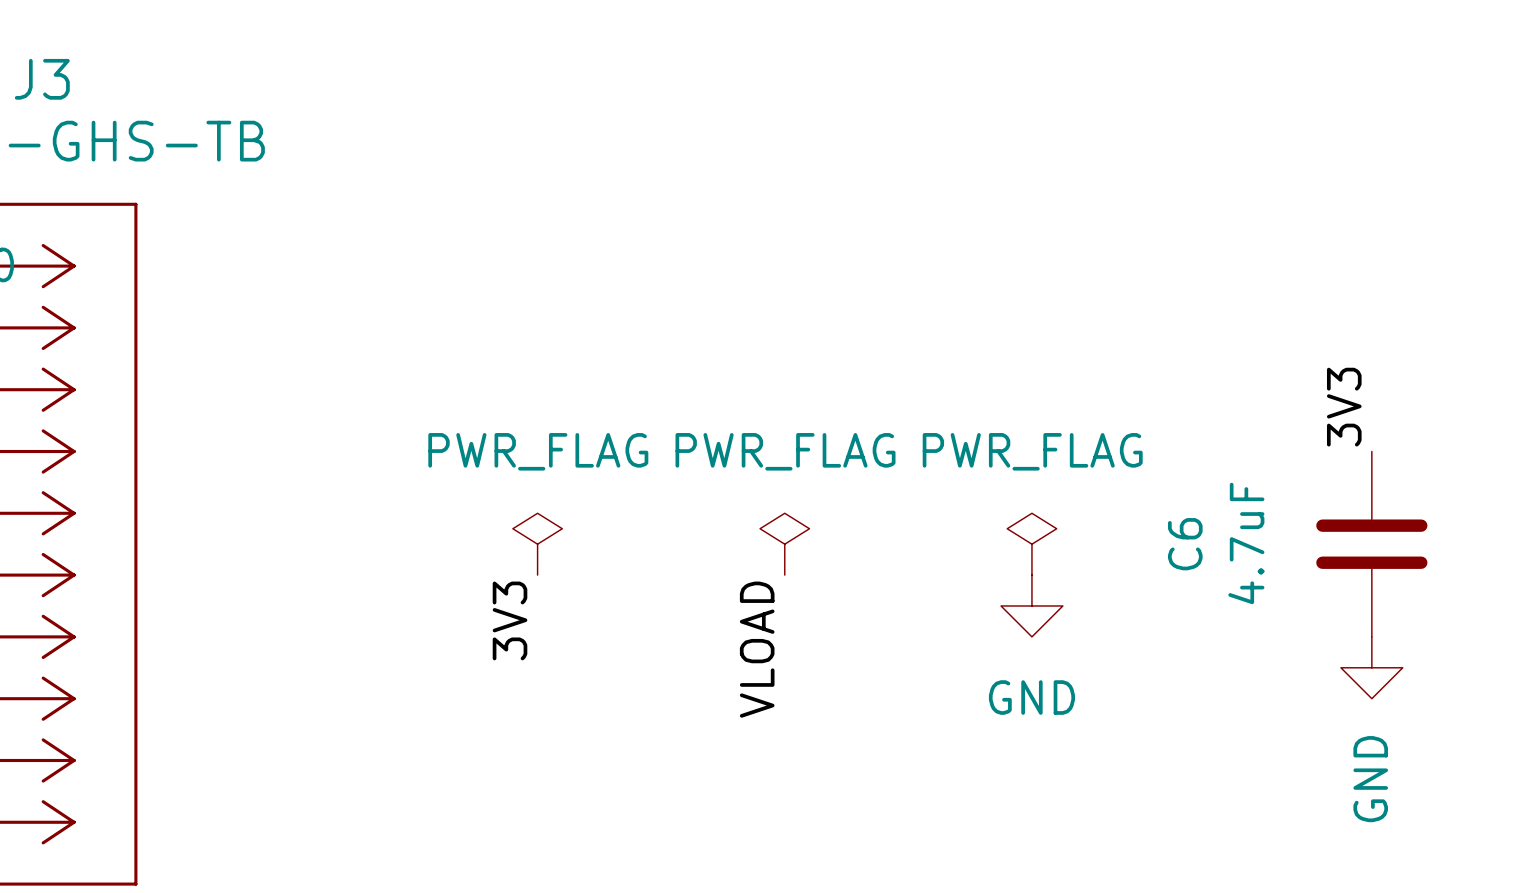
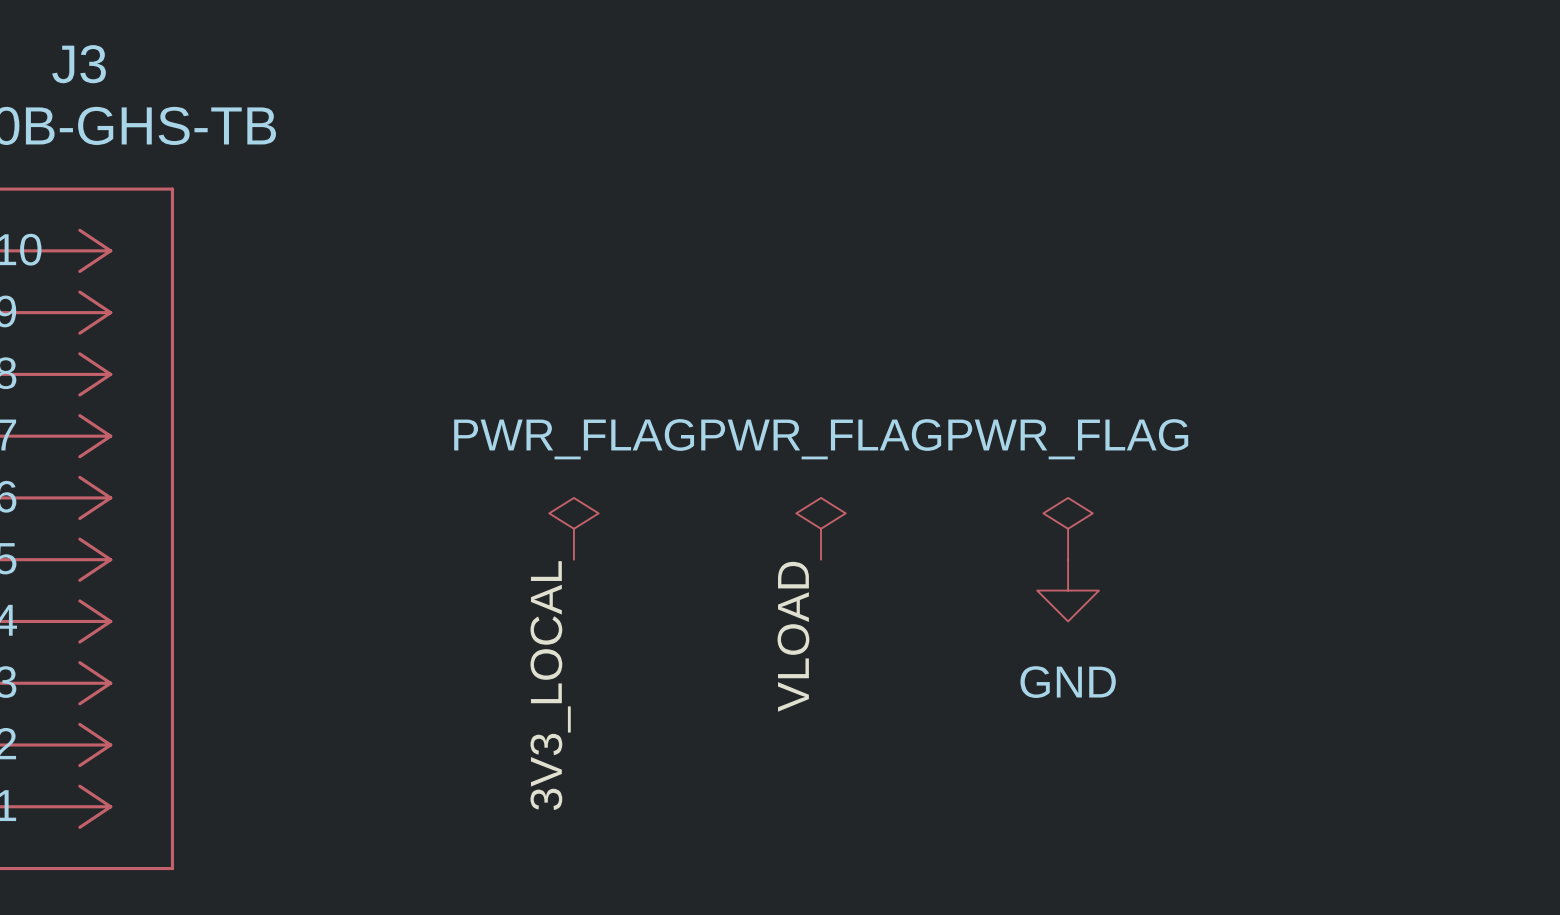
label: 3V3 (1344, 407) -> none
C6: 4.7uF (1371, 544) -> none
label: 3V3 (510, 620) -> 3V3_LOCAL (550, 685)
power symbol: GND (1371, 667) -> none

